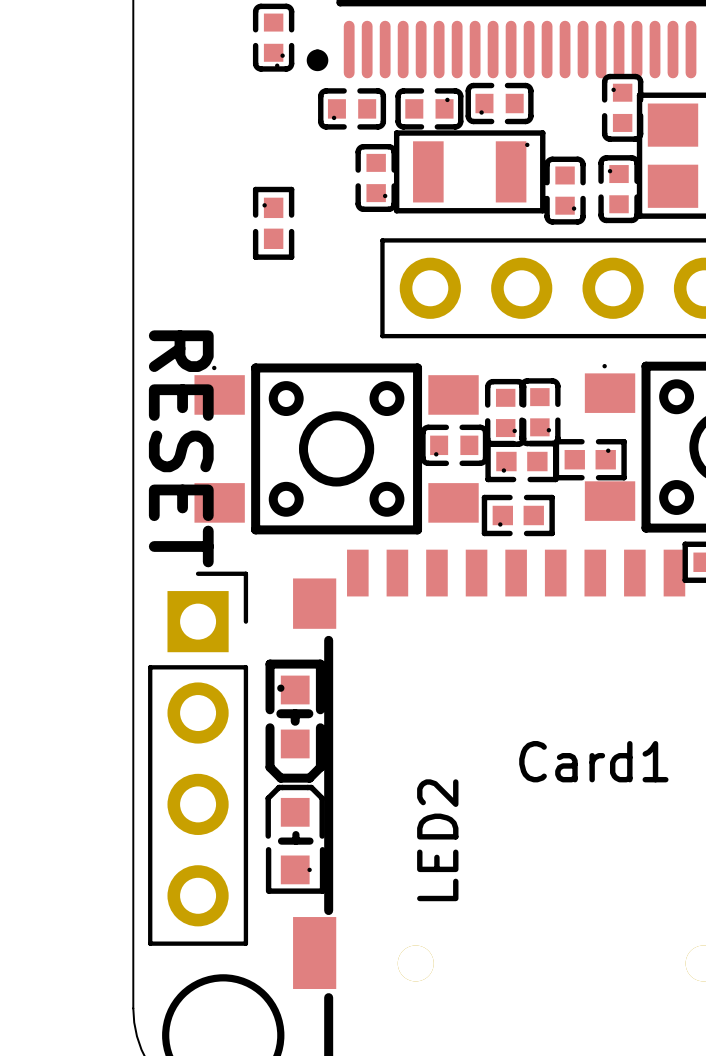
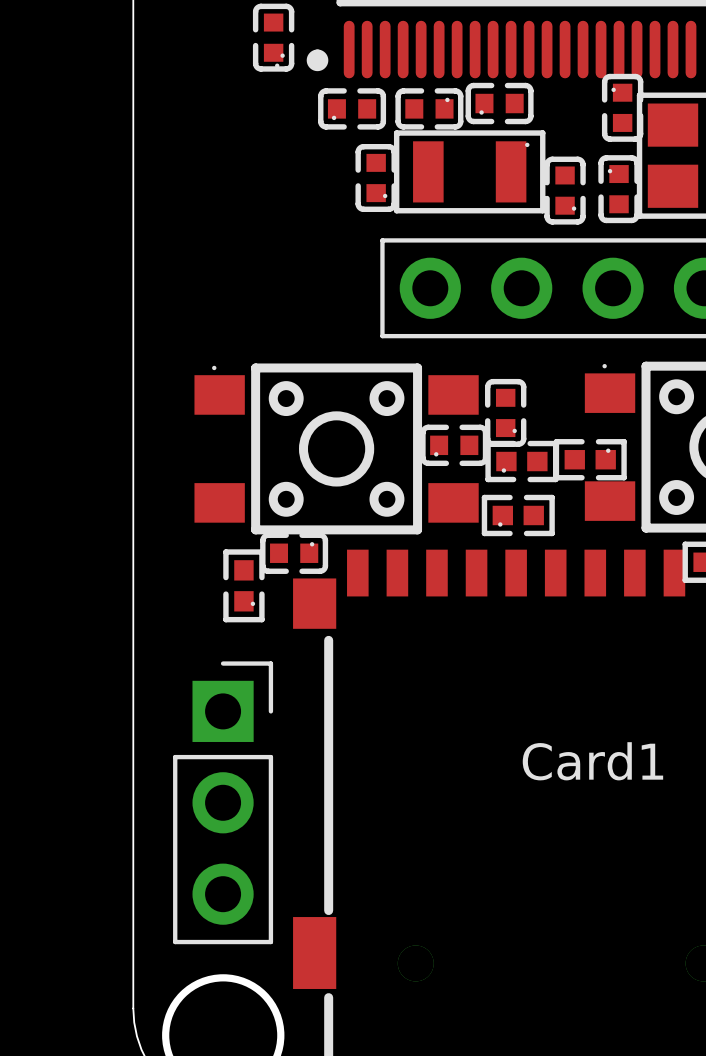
part rotation: 0° (273, 223) -> 180° (243, 585)
part position: (273, 223) -> (243, 585)
part rotation: 0° (539, 412) -> 90° counterclockwise (294, 553)
part position: (539, 412) -> (294, 553)
text: RESET (181, 448) -> none
part: (295, 721) -> none
part: (198, 758) -> none
part: none -> (223, 802)
LED2: (295, 839) -> none

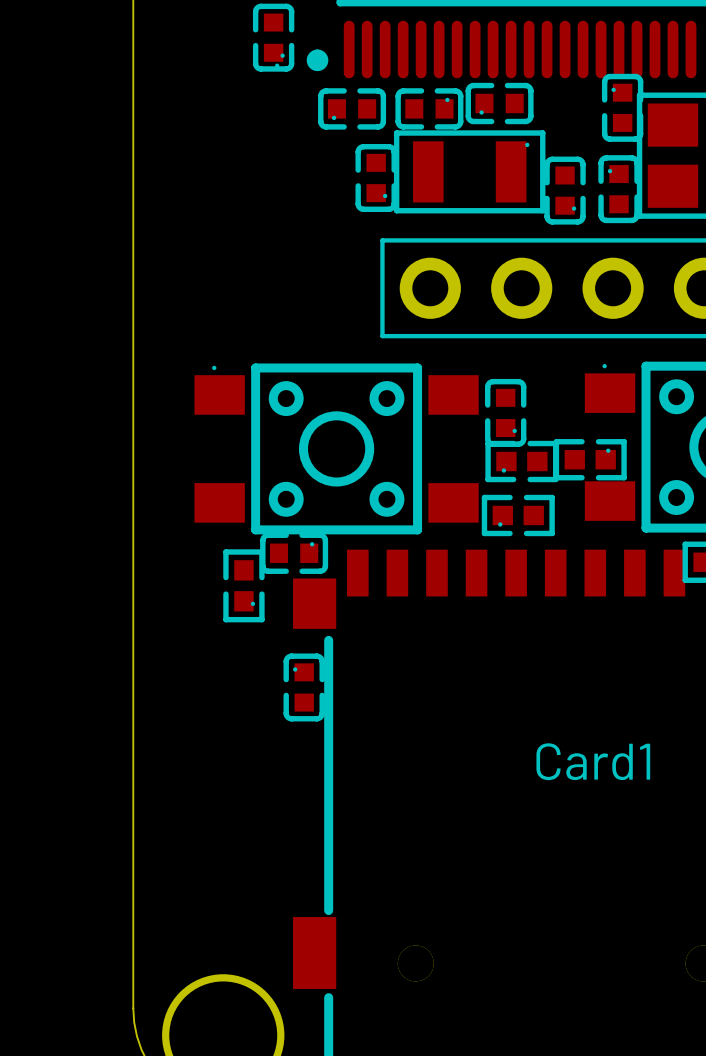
part rotation: 0° (454, 445) -> 90° clockwise (304, 687)
part position: (454, 445) -> (304, 687)
part: (223, 802) -> none

